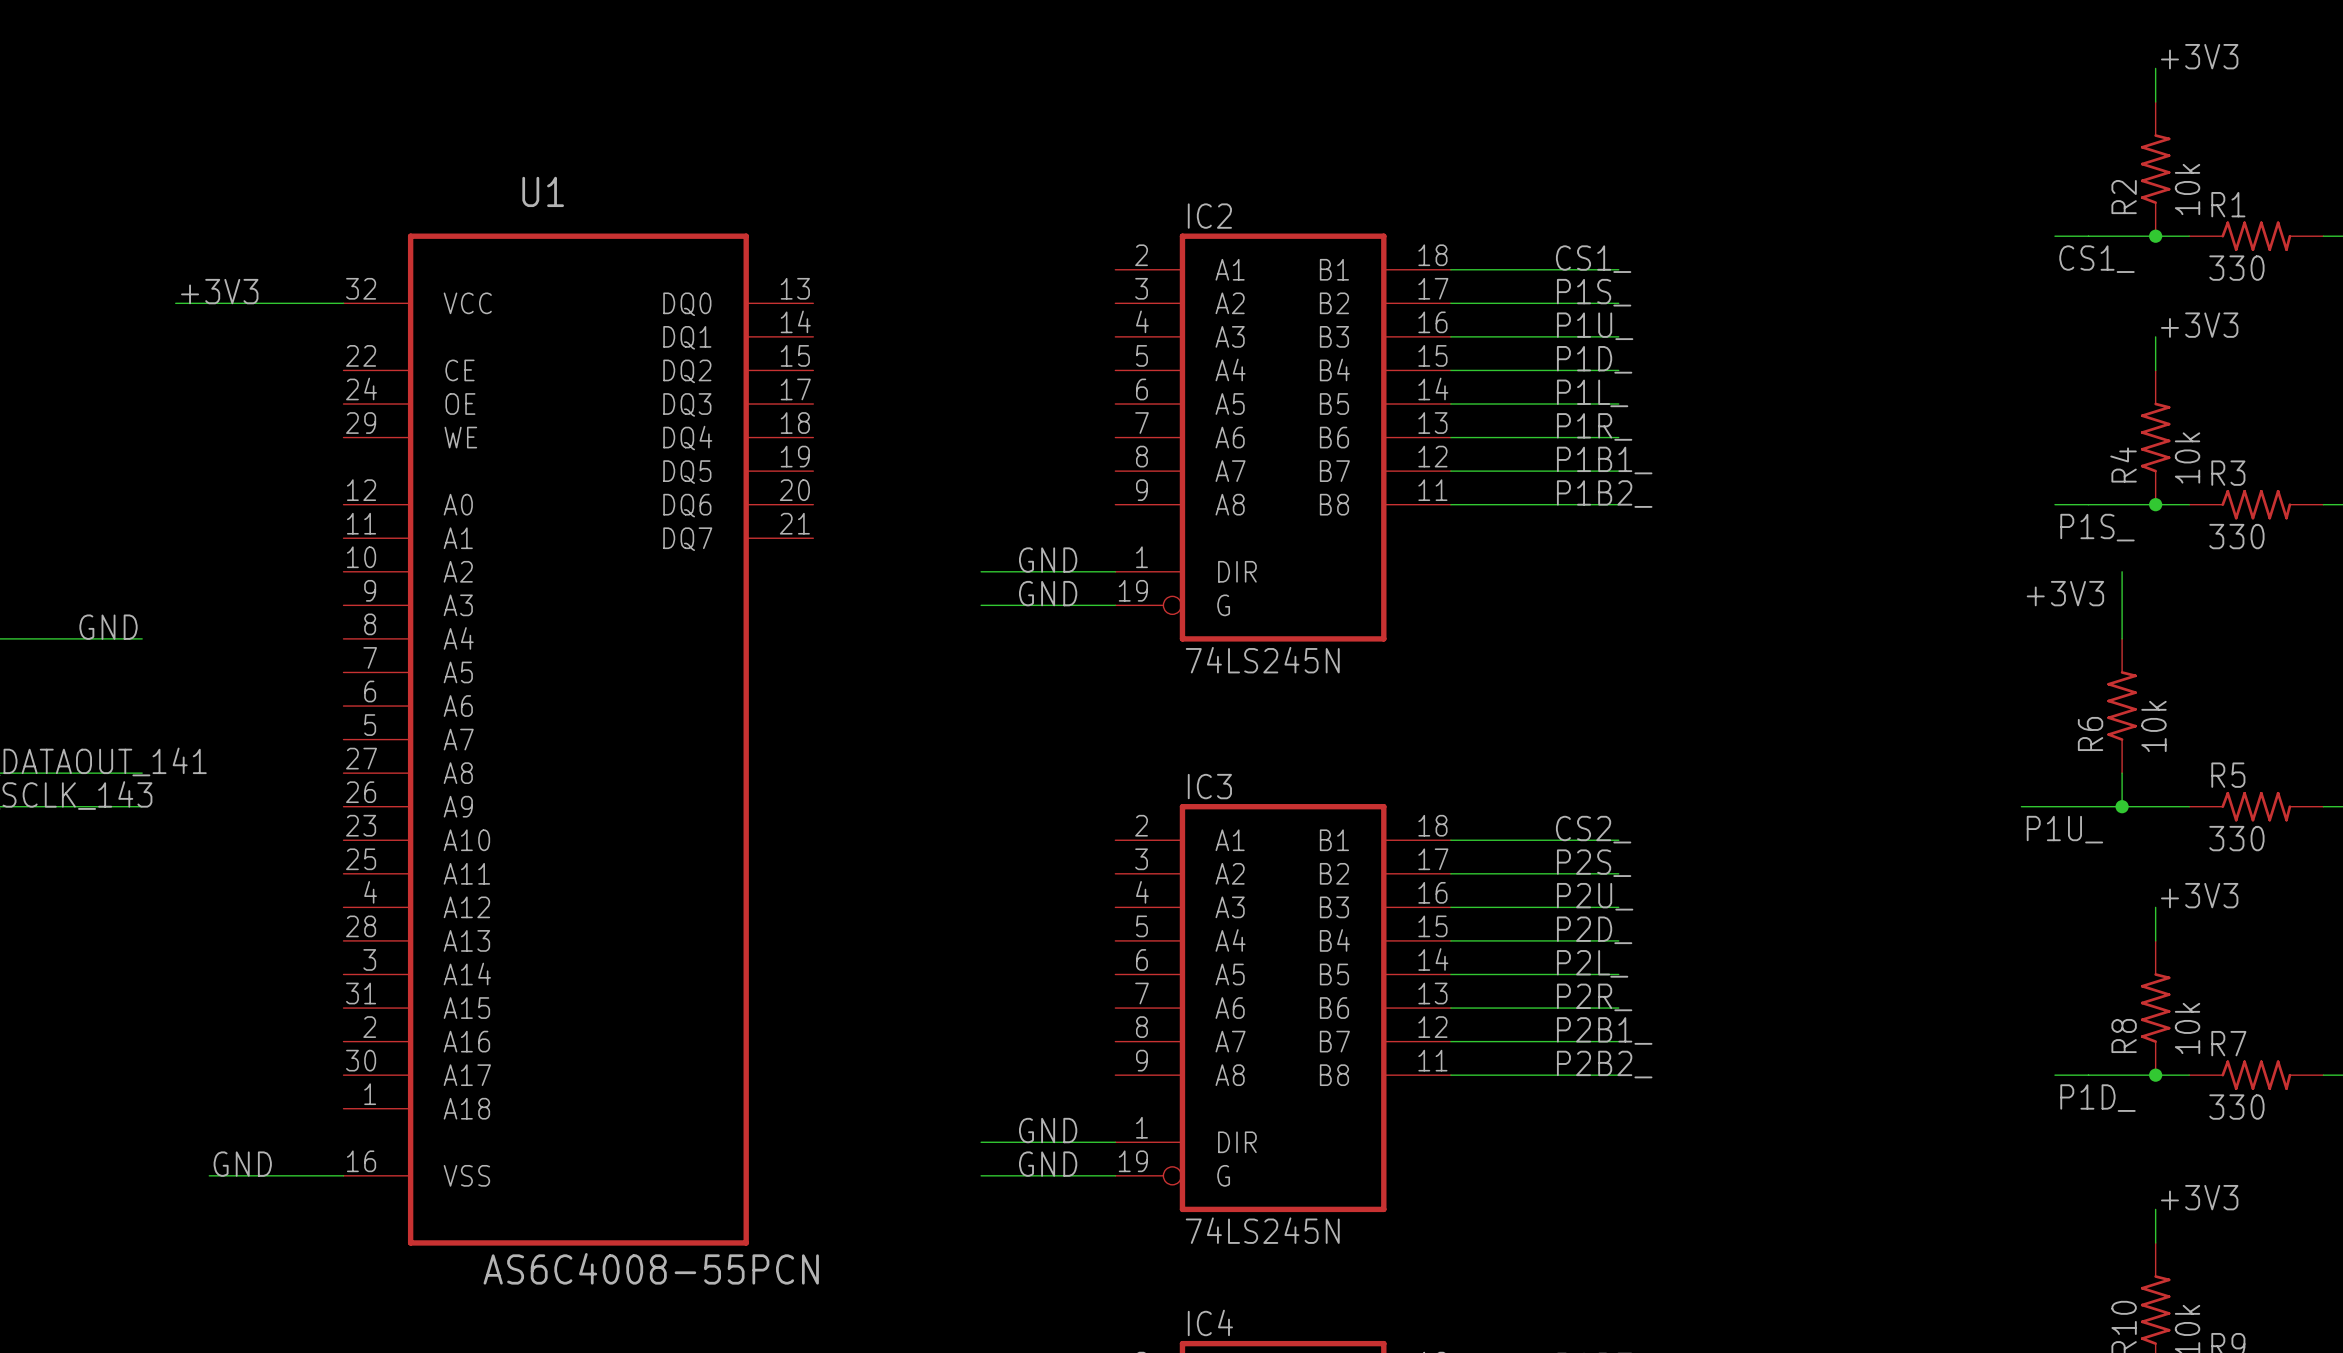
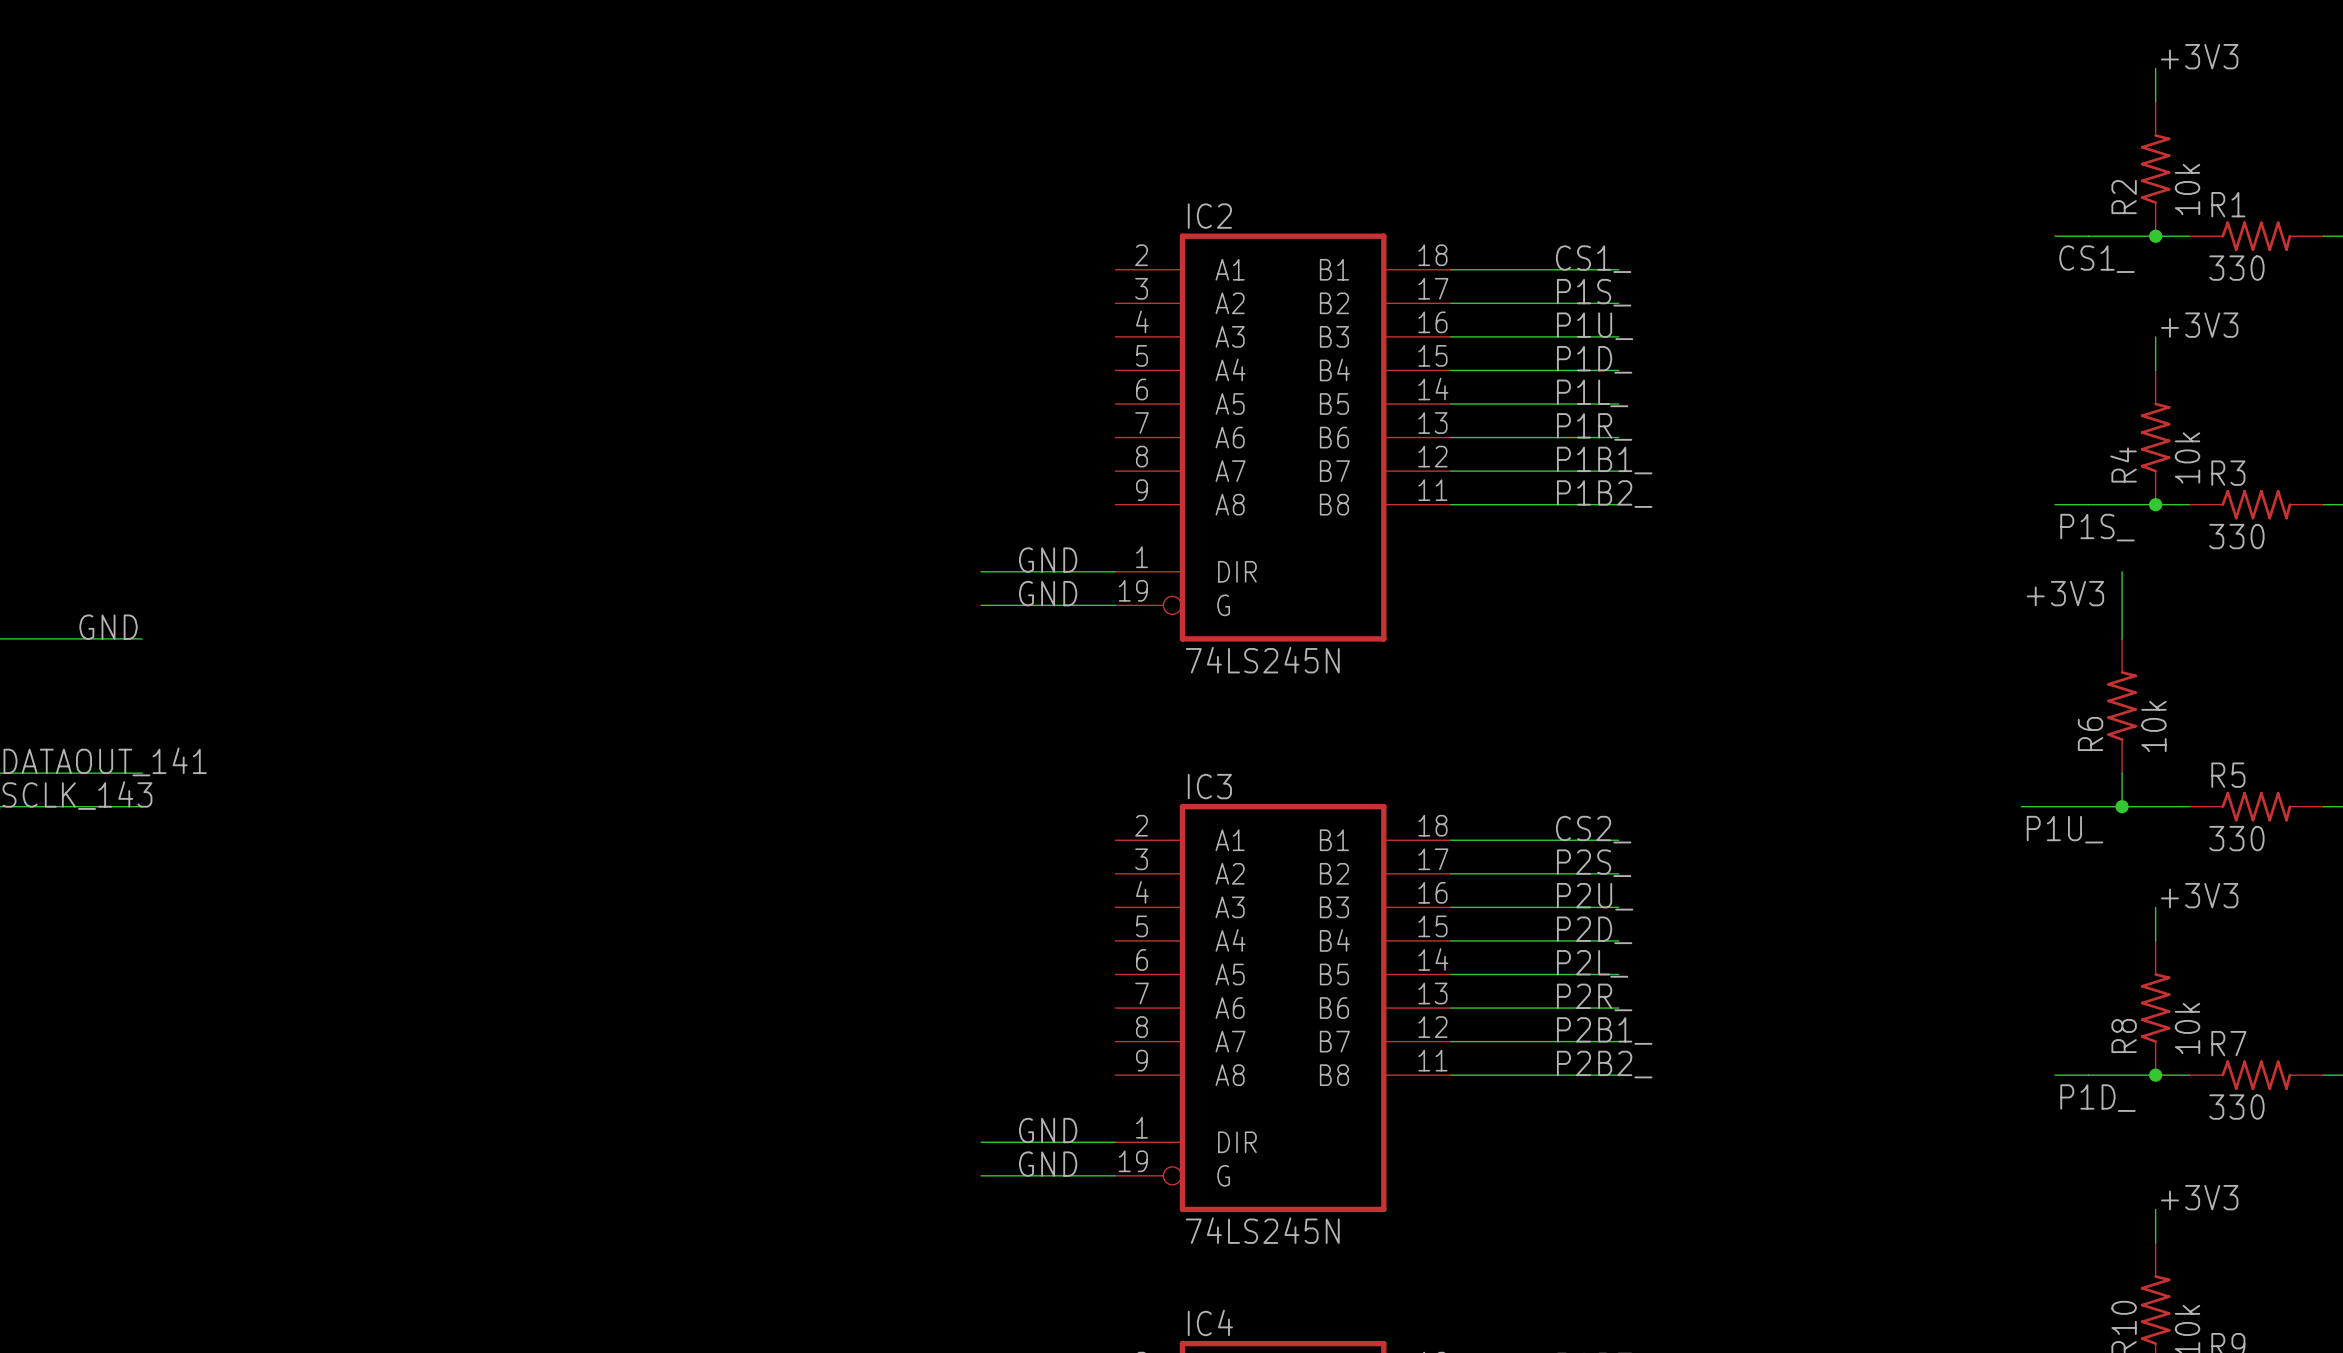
label: +3V3 (219, 291) -> none
wire: (175, 303) (343, 303) -> none
U1: AS6C4008-55PCN (578, 739) -> none
label: GND (242, 1164) -> none
wire: (209, 1175) (343, 1175) -> none

